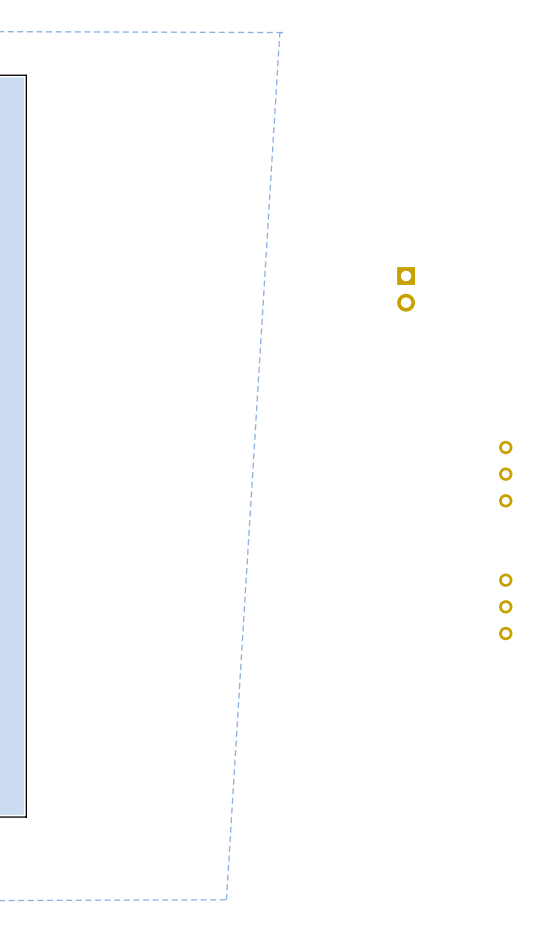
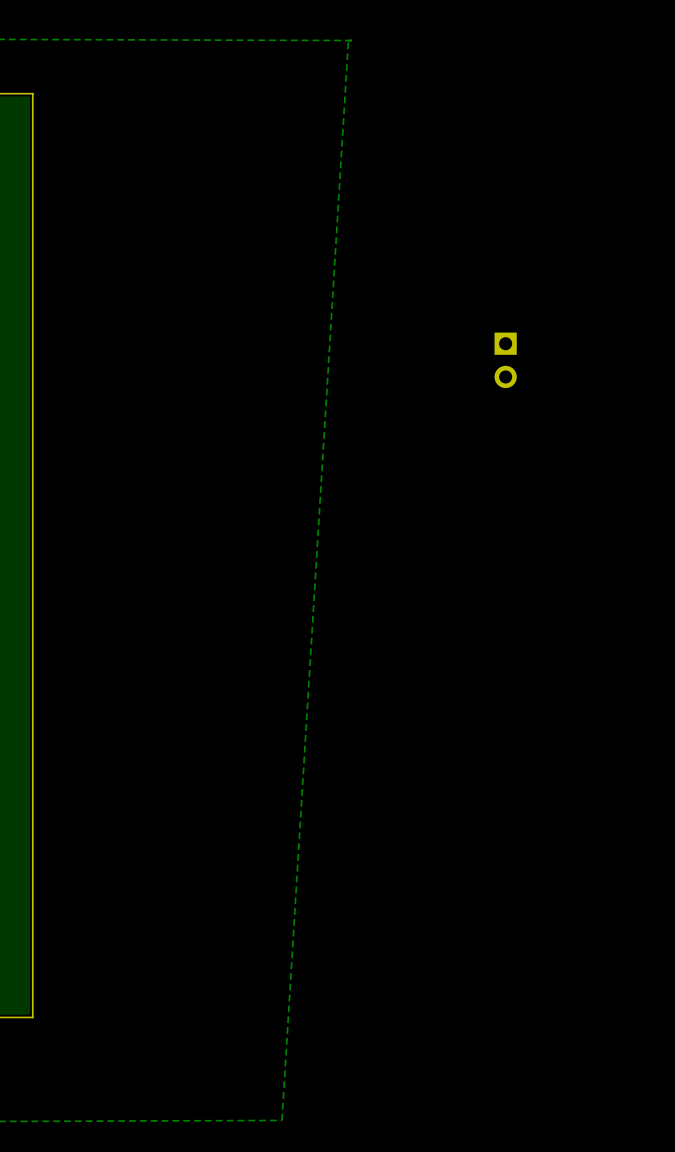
part: (505, 474) -> none
part: (505, 606) -> none

